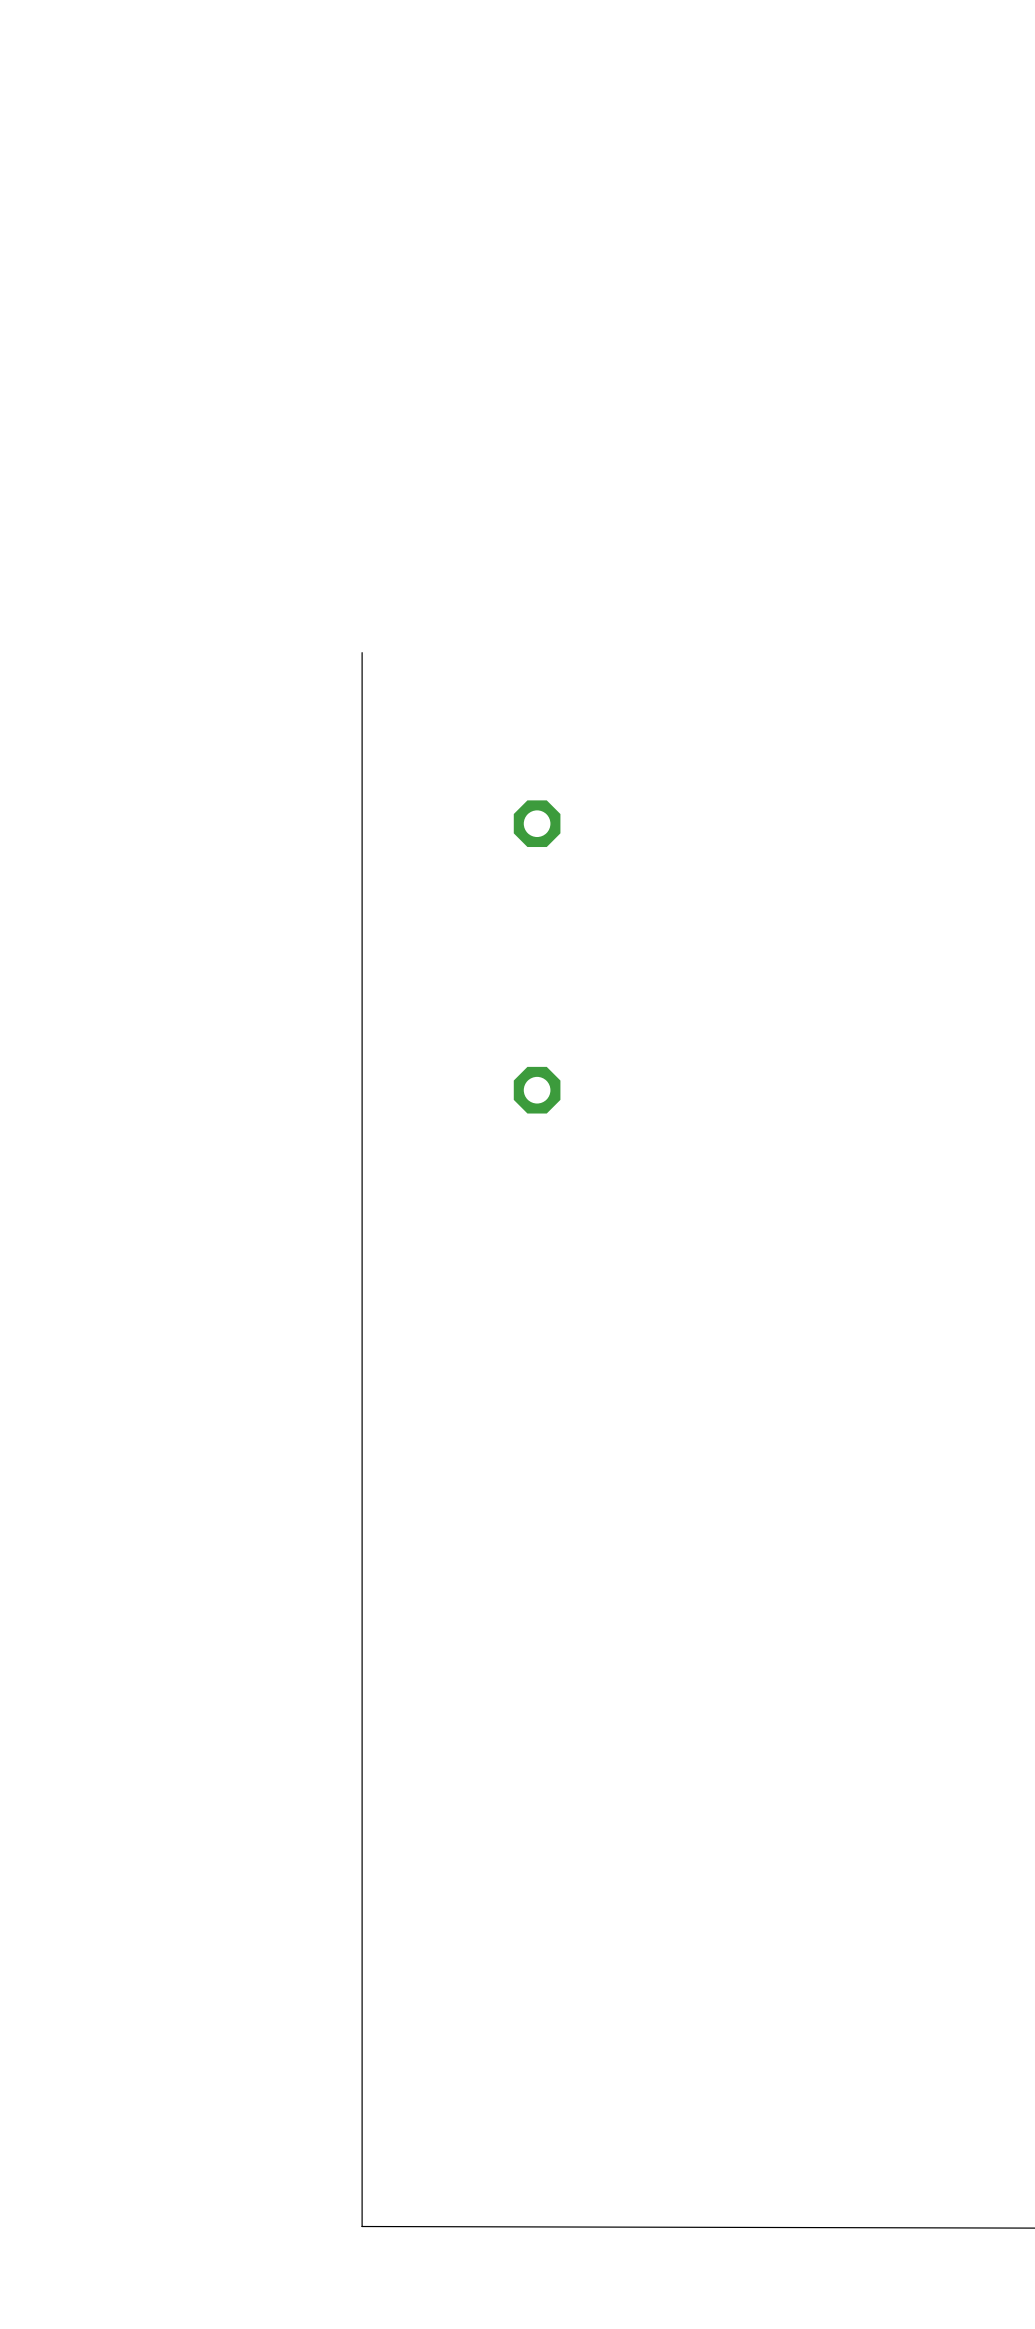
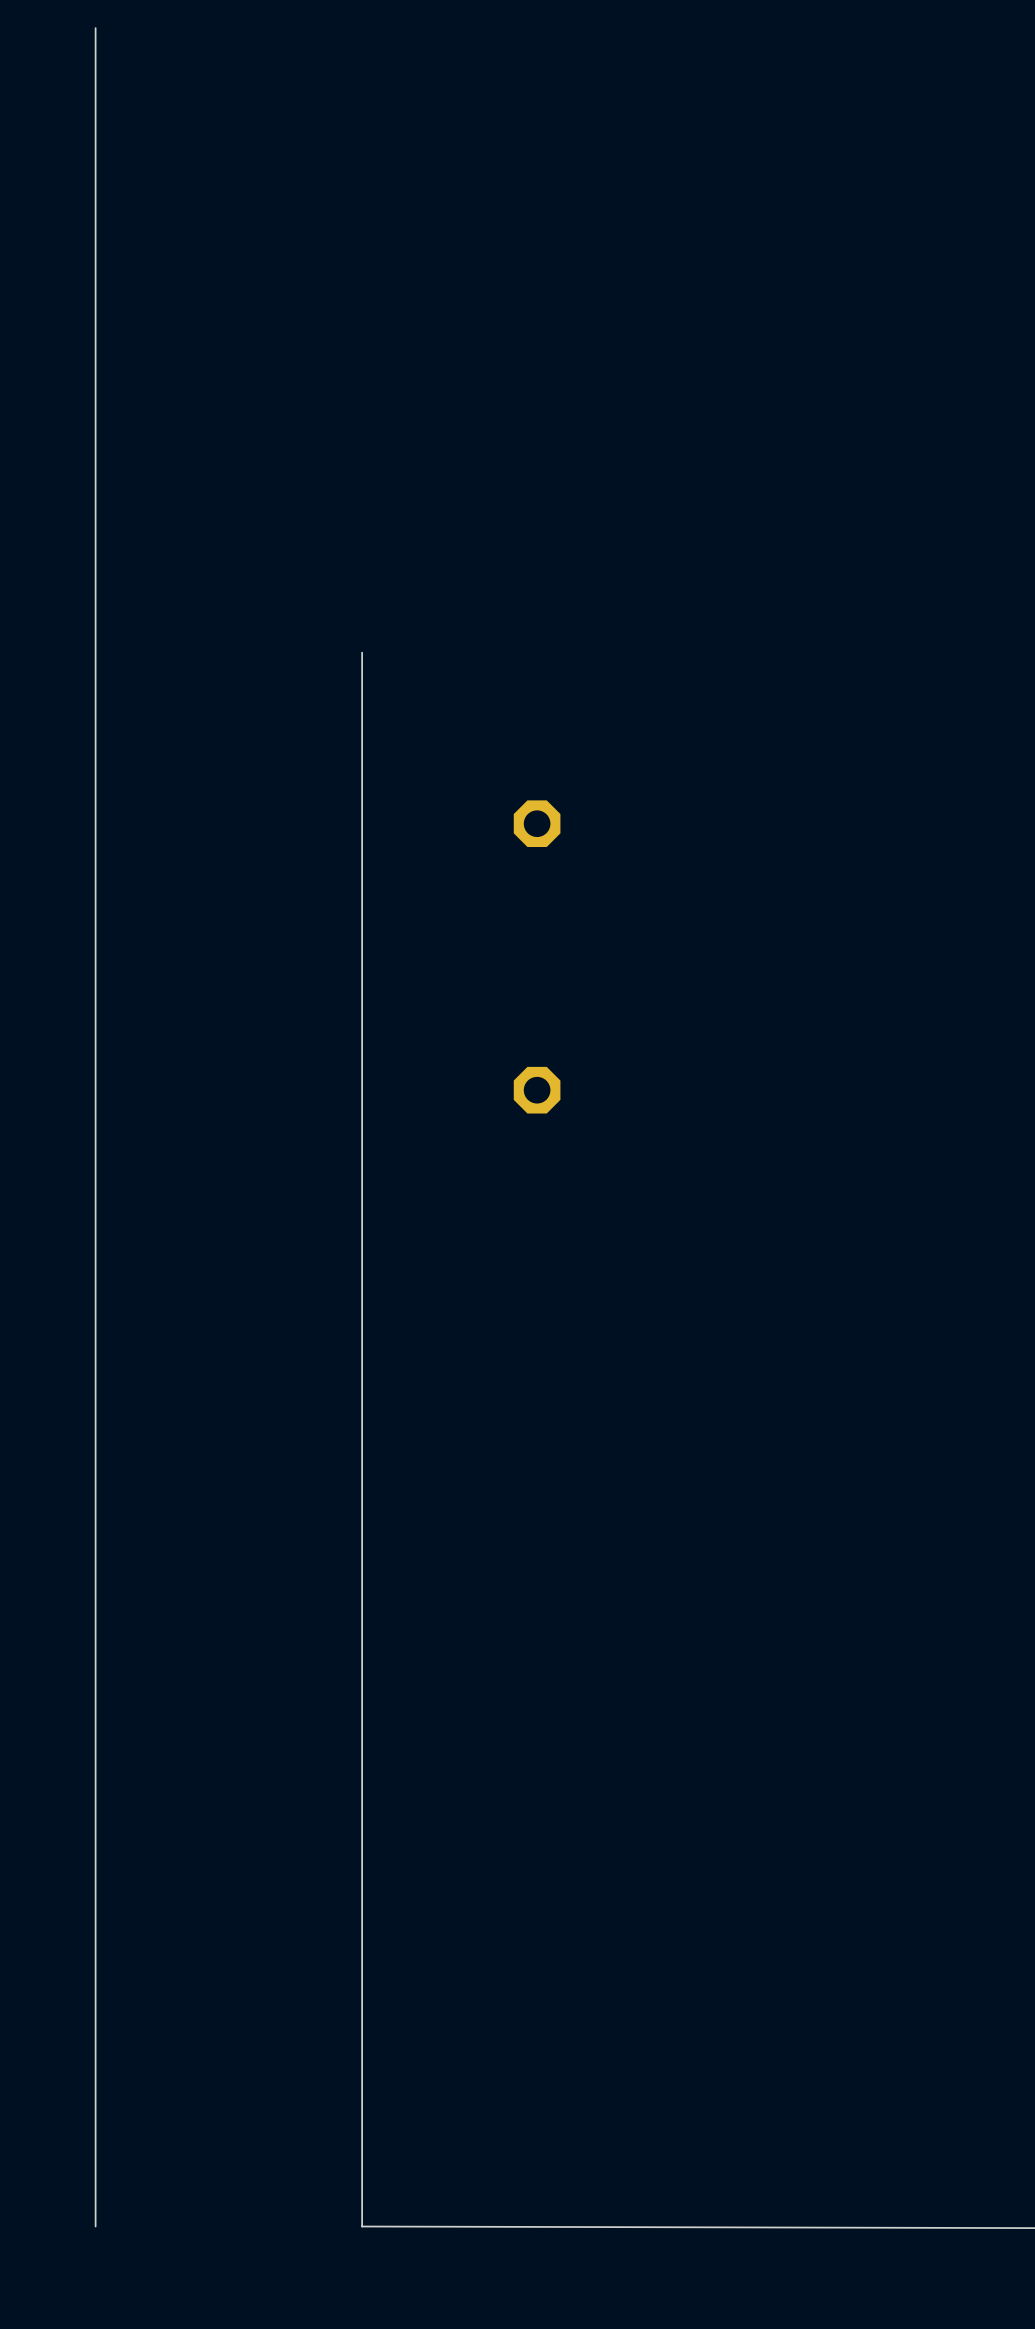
board edge: none -> (95, 28) (95, 2226)

